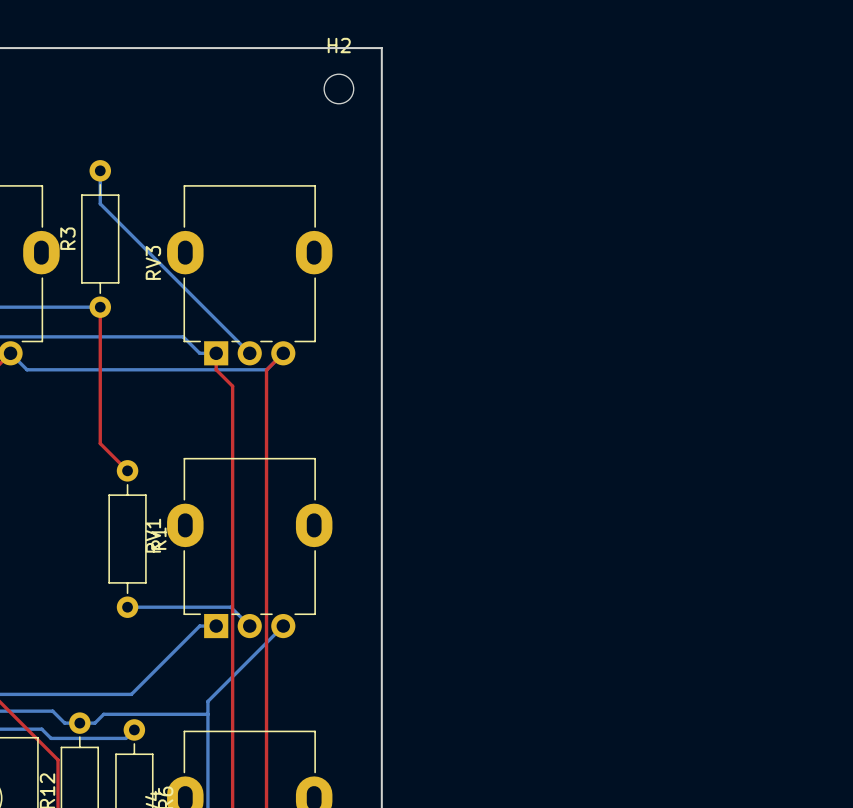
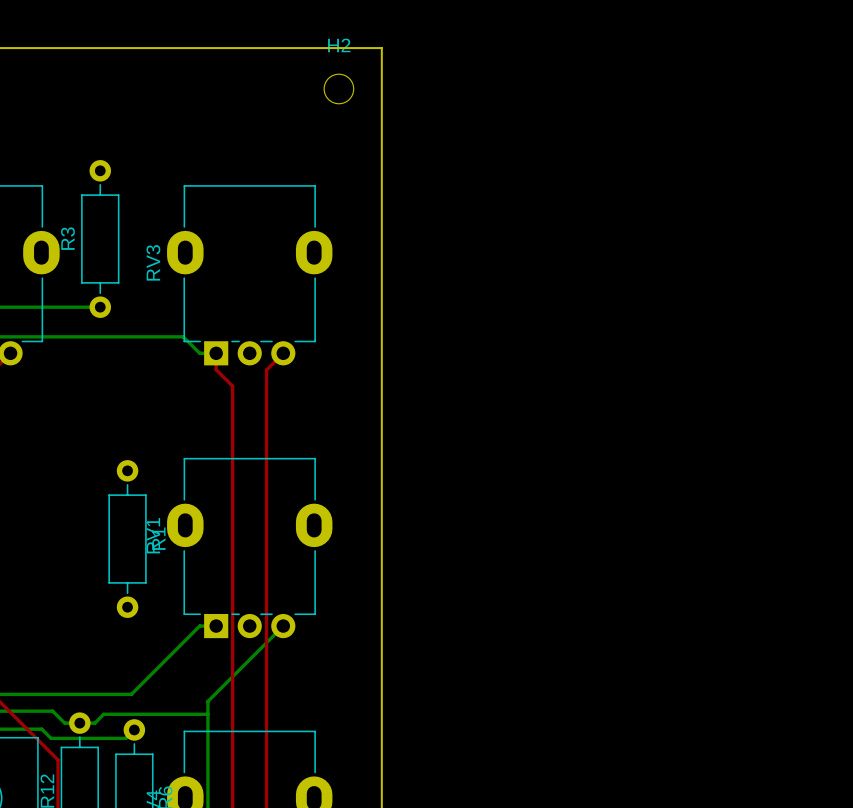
bottom track: (100, 170) (100, 203) (249, 353) -> none
top track: (100, 307) (100, 443) (127, 470) -> none
bottom track: (10, 353) (27, 369) (266, 369) (283, 353) -> none
bottom track: (127, 607) (230, 607) (249, 626) -> none

